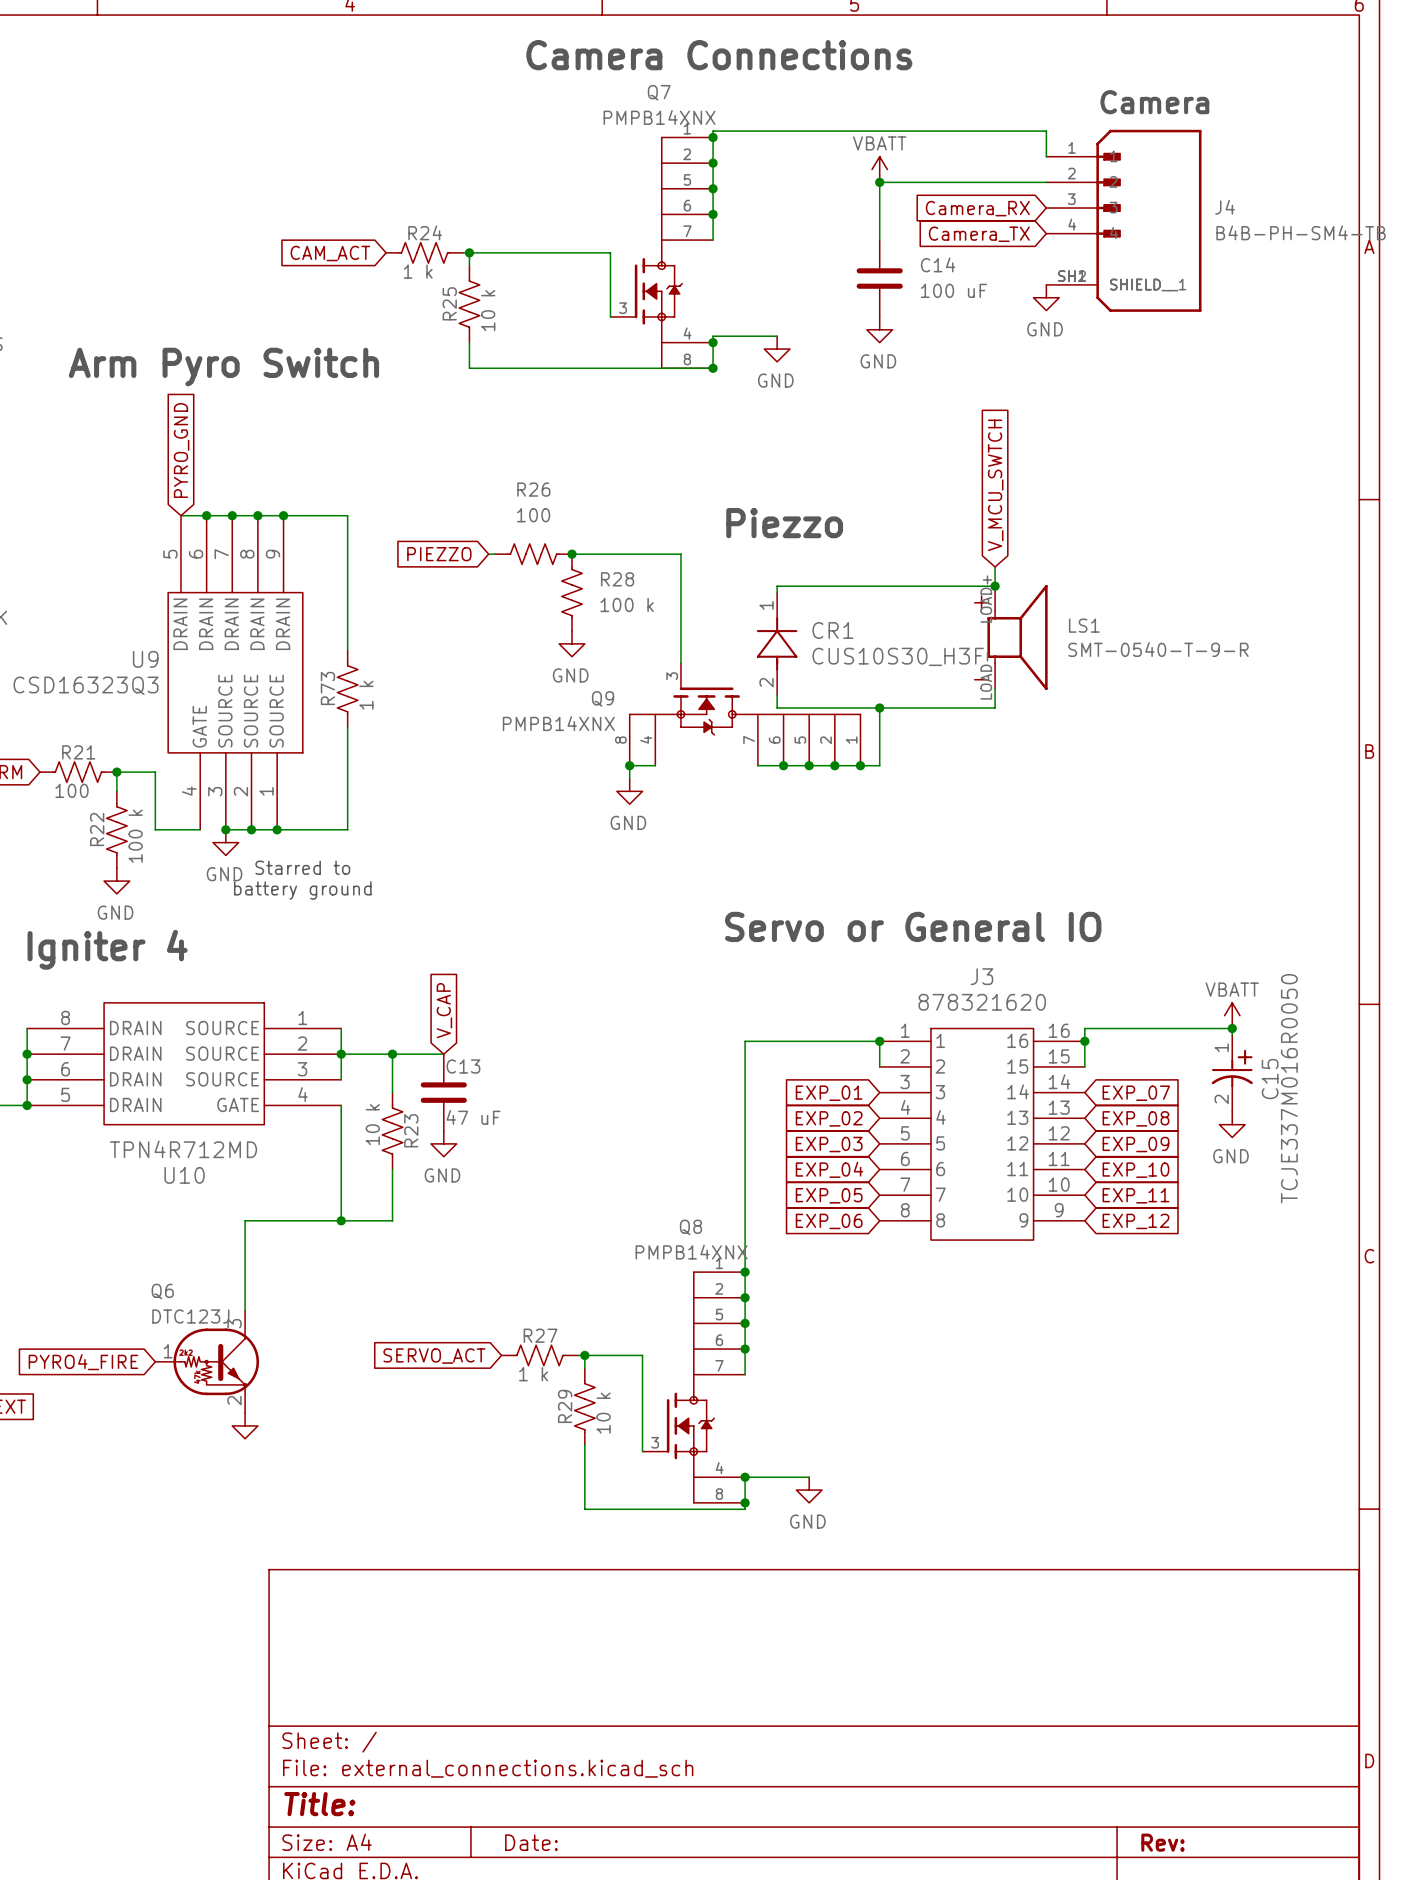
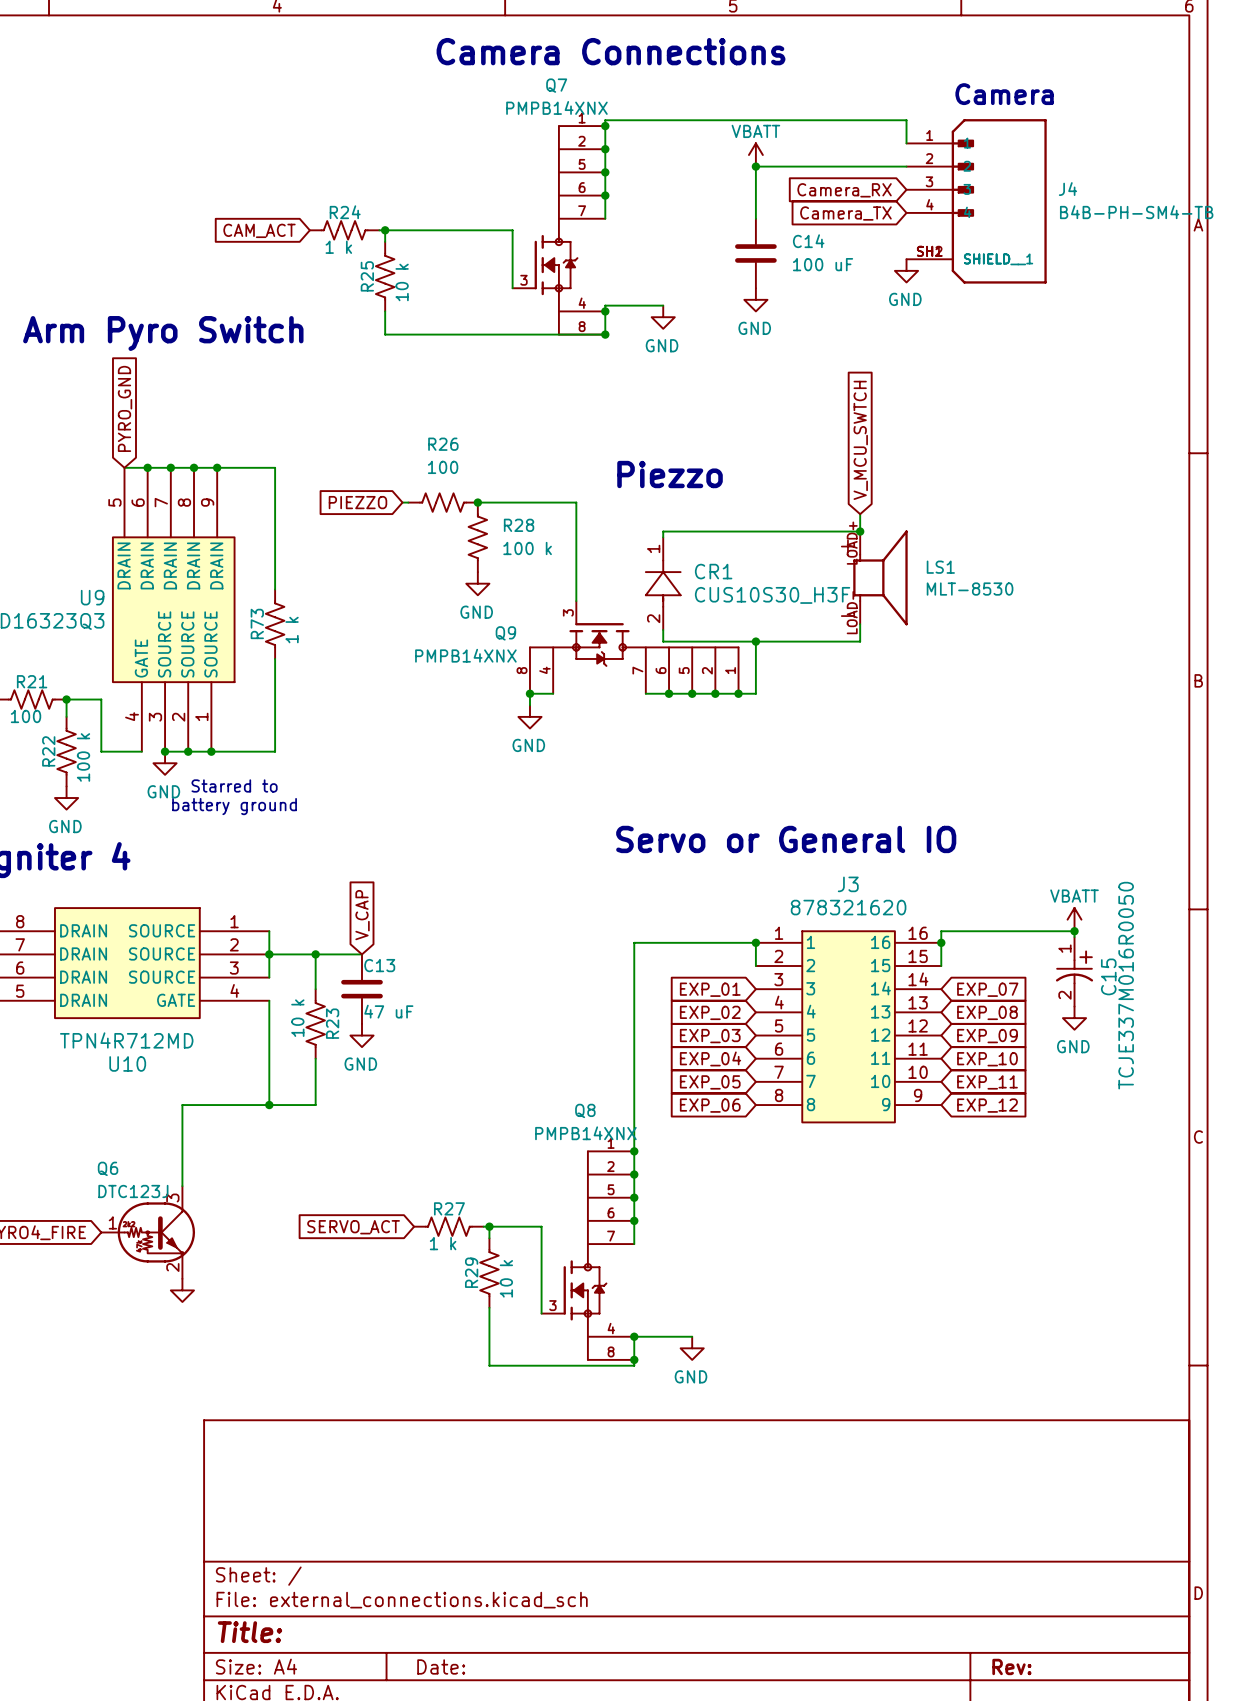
LS1 value: SMT-0540-T-9-R (1158, 649) -> MLT-8530 (970, 589)

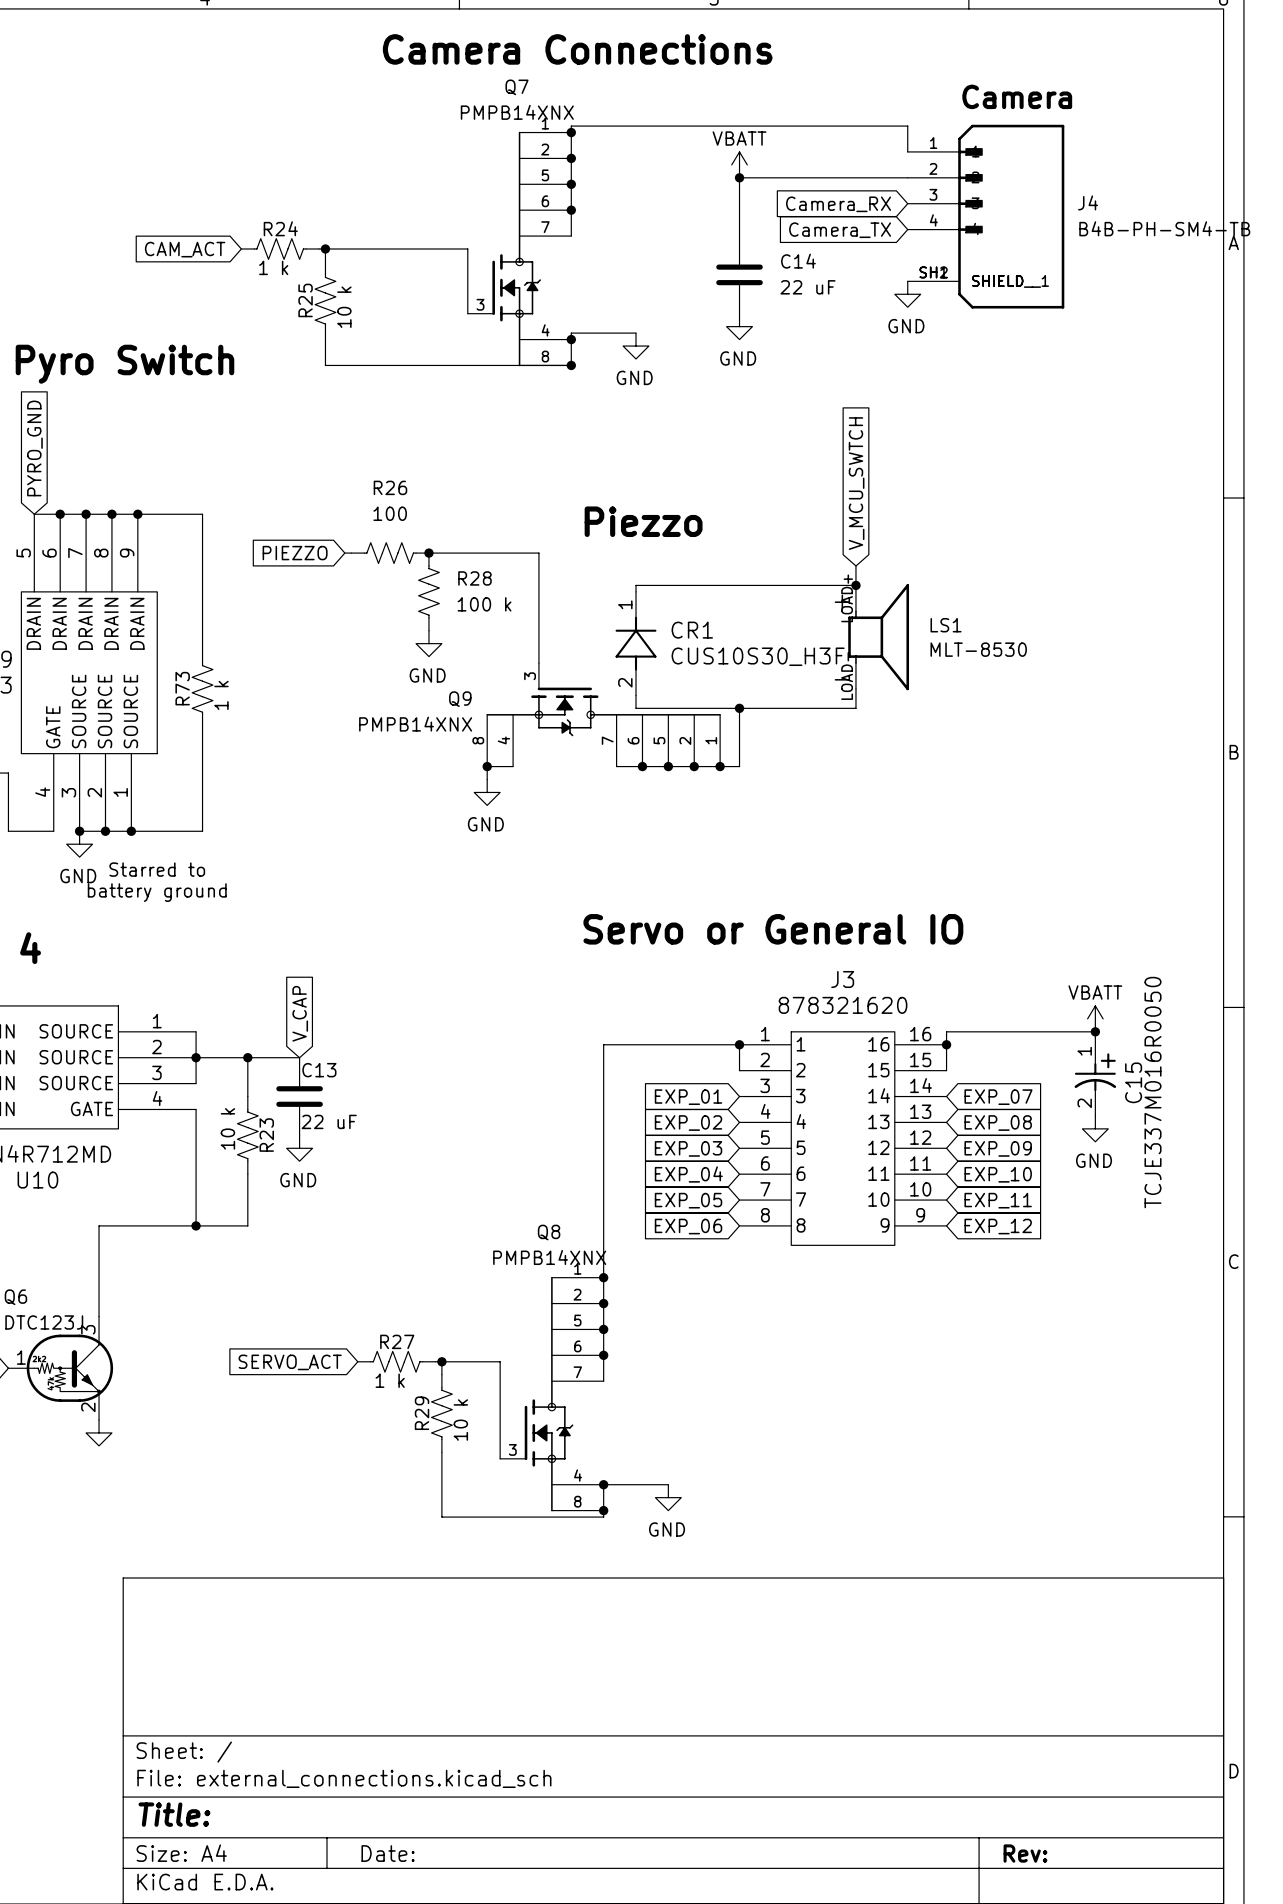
C14 value: 100 uF (823, 264) -> 22 uF (808, 287)
C13 value: 47 uF (388, 1011) -> 22 uF (329, 1121)

